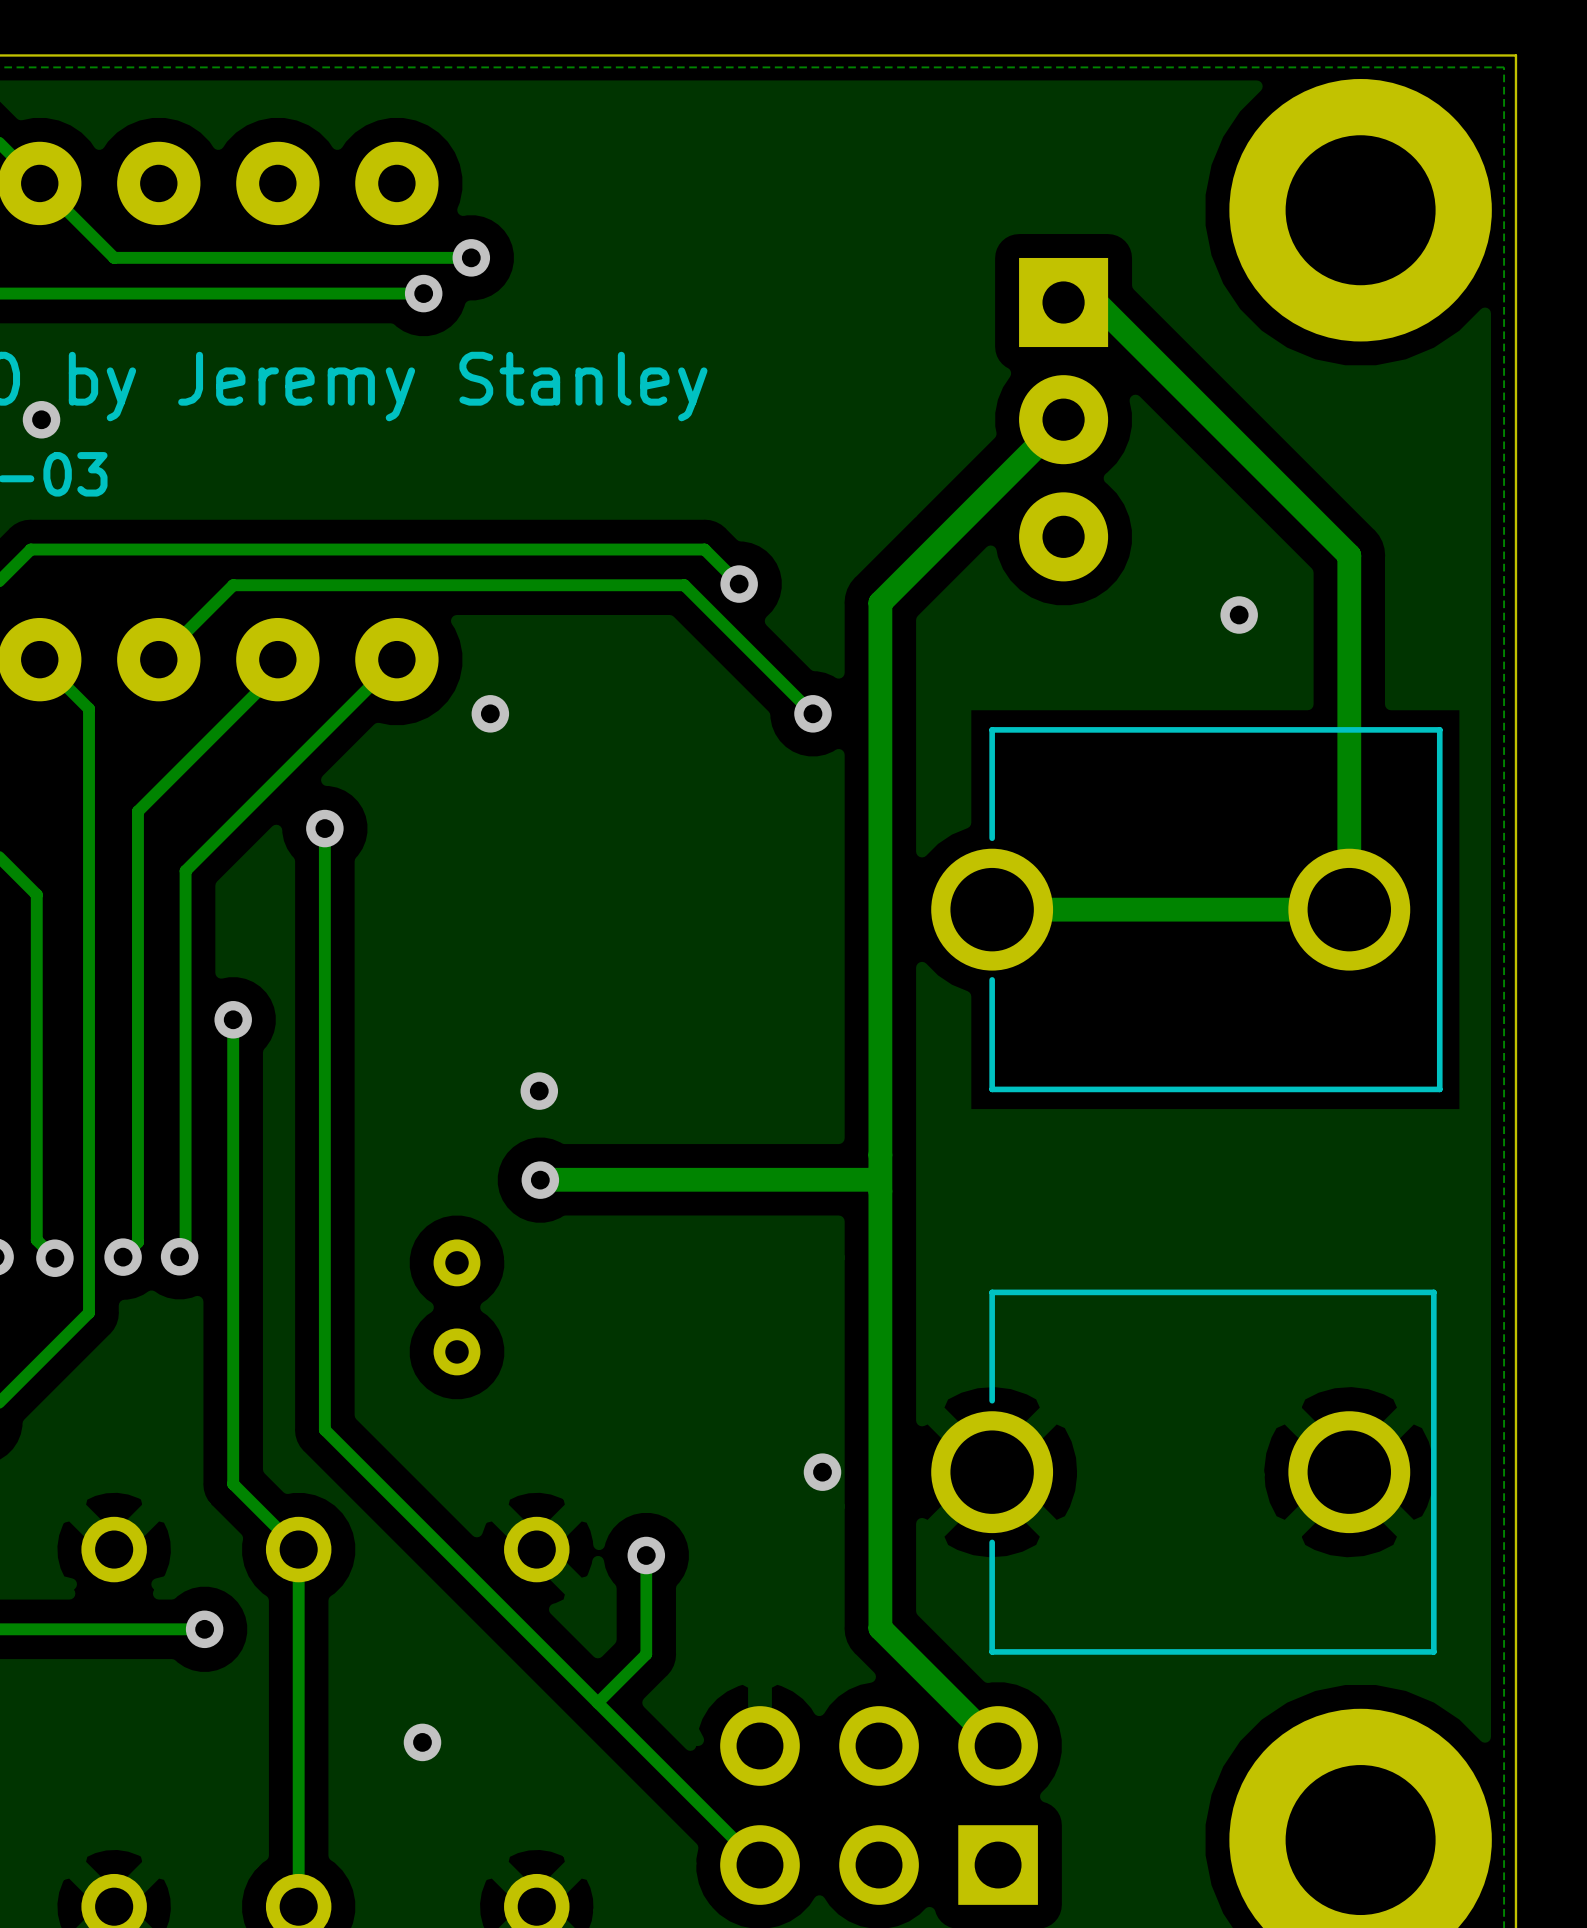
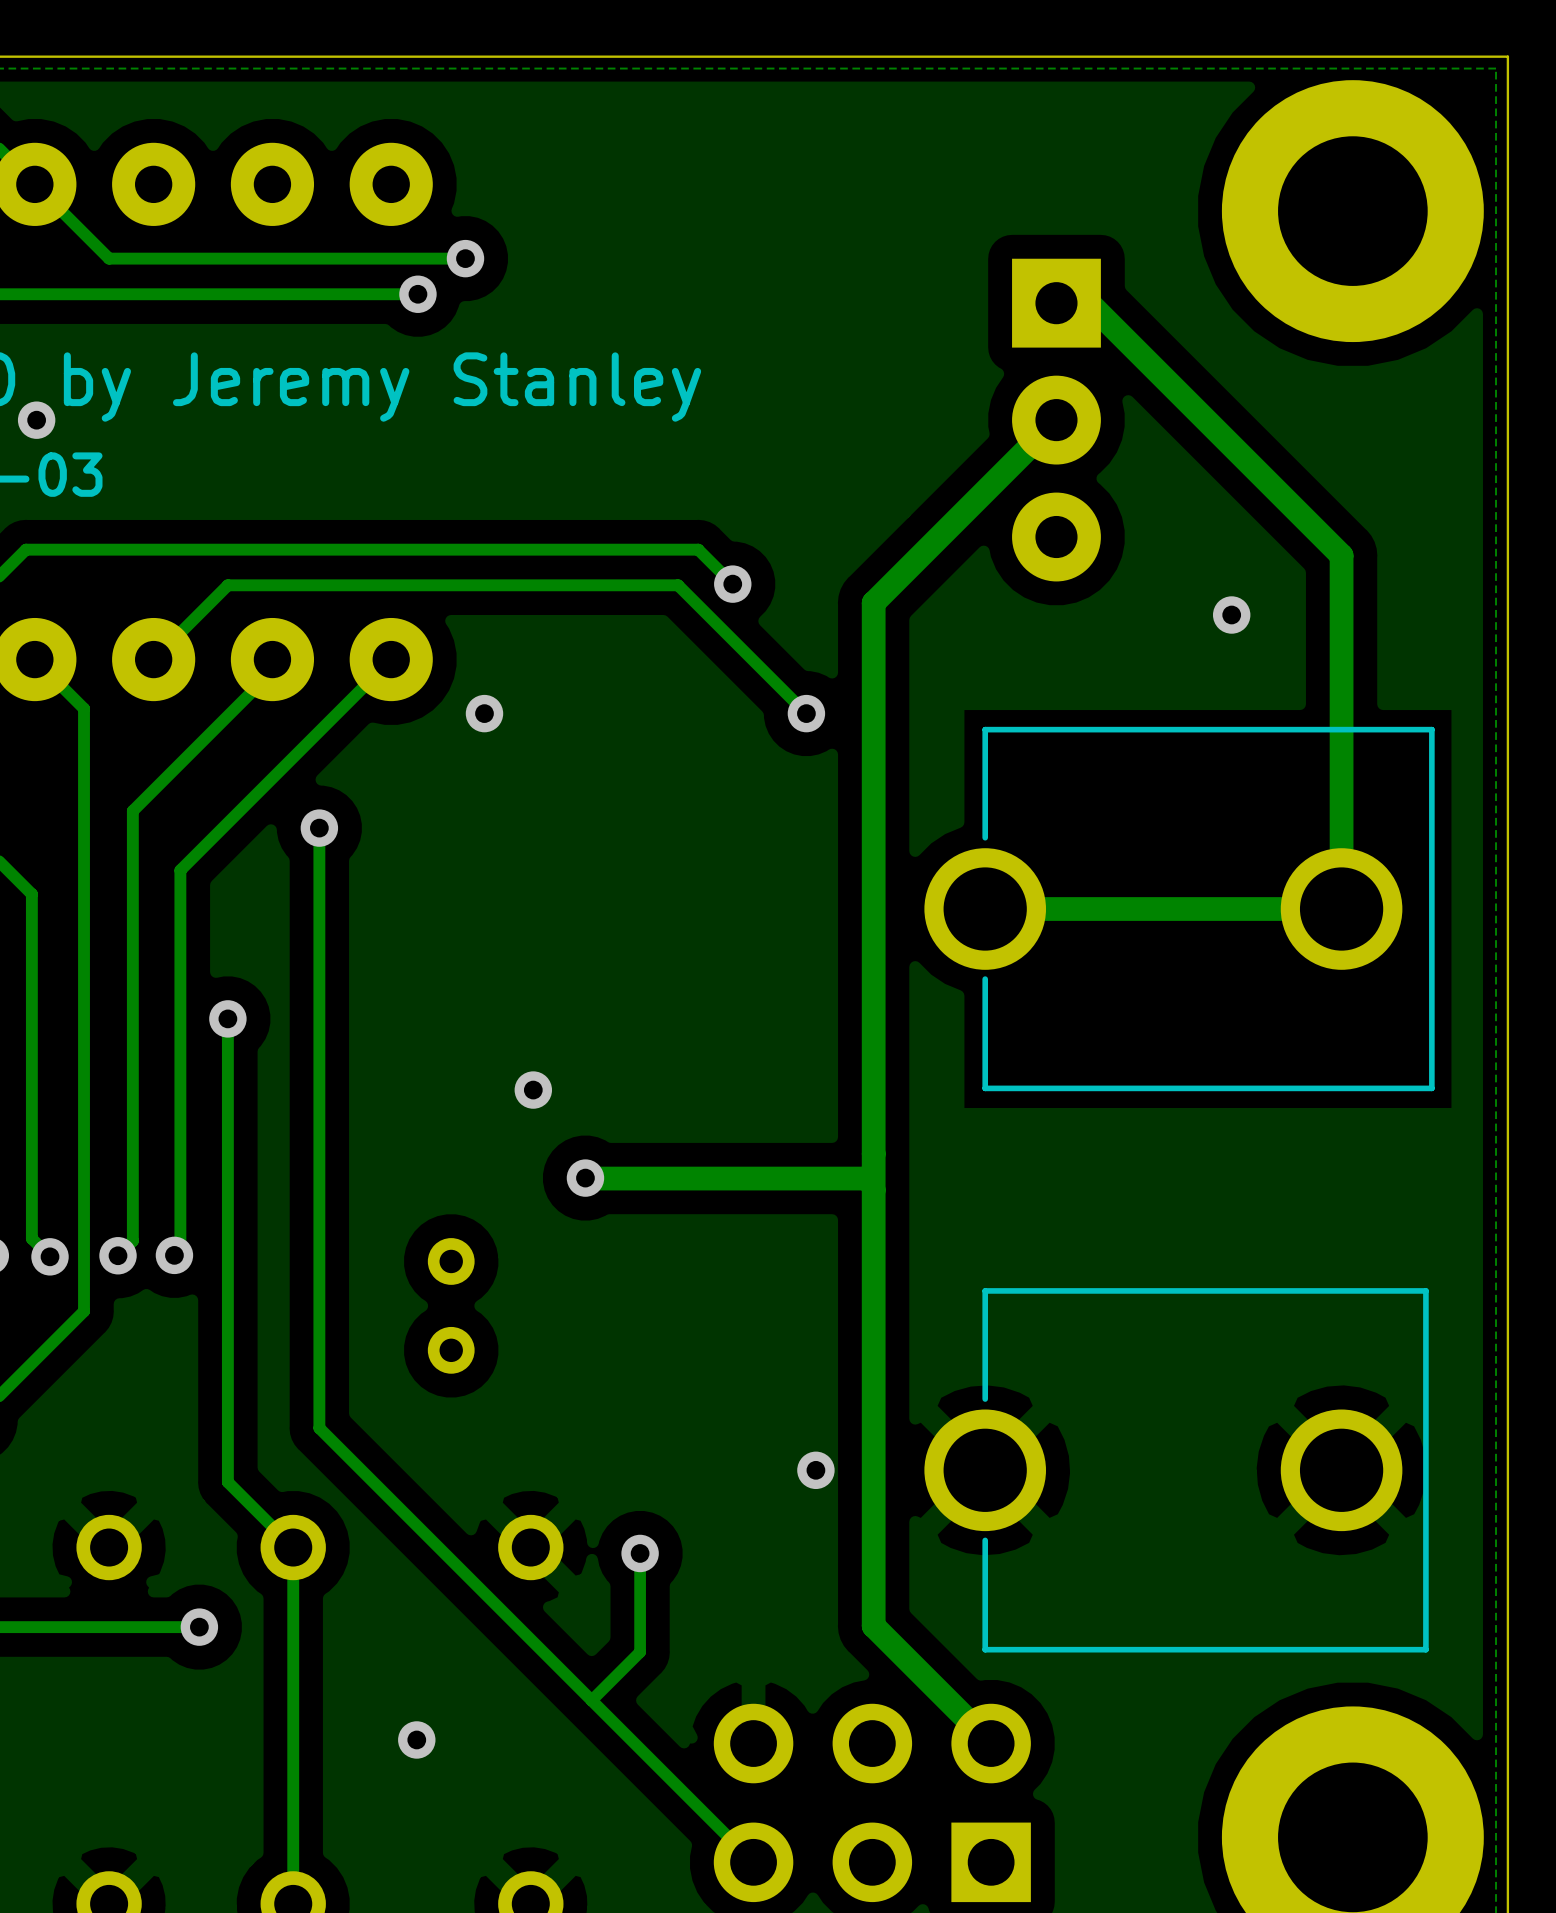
track: (592, 1179) (549, 1179) -> none
via position: (540, 1180) -> (585, 1178)

